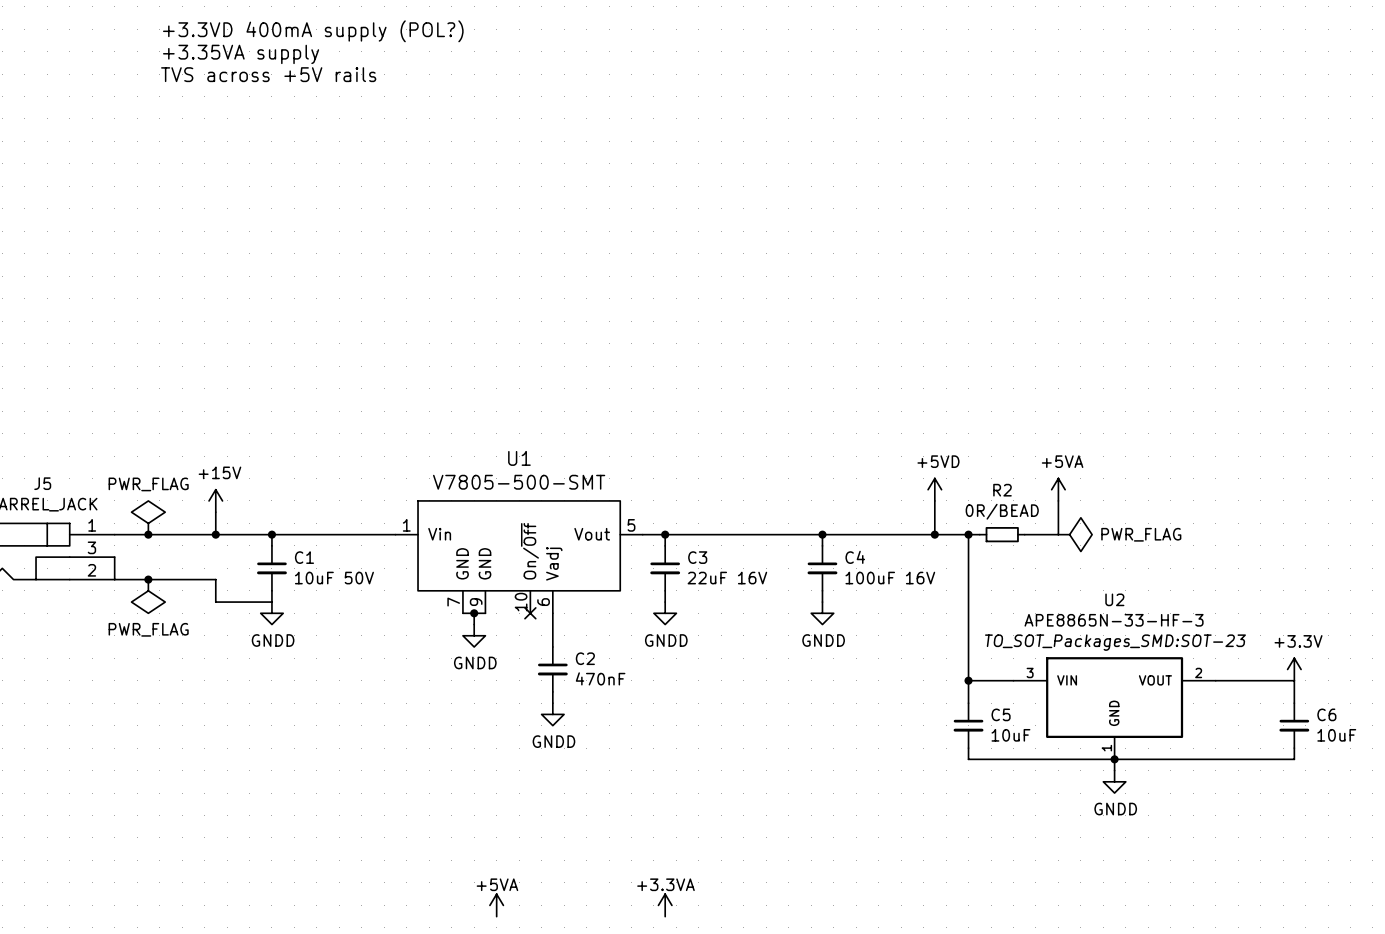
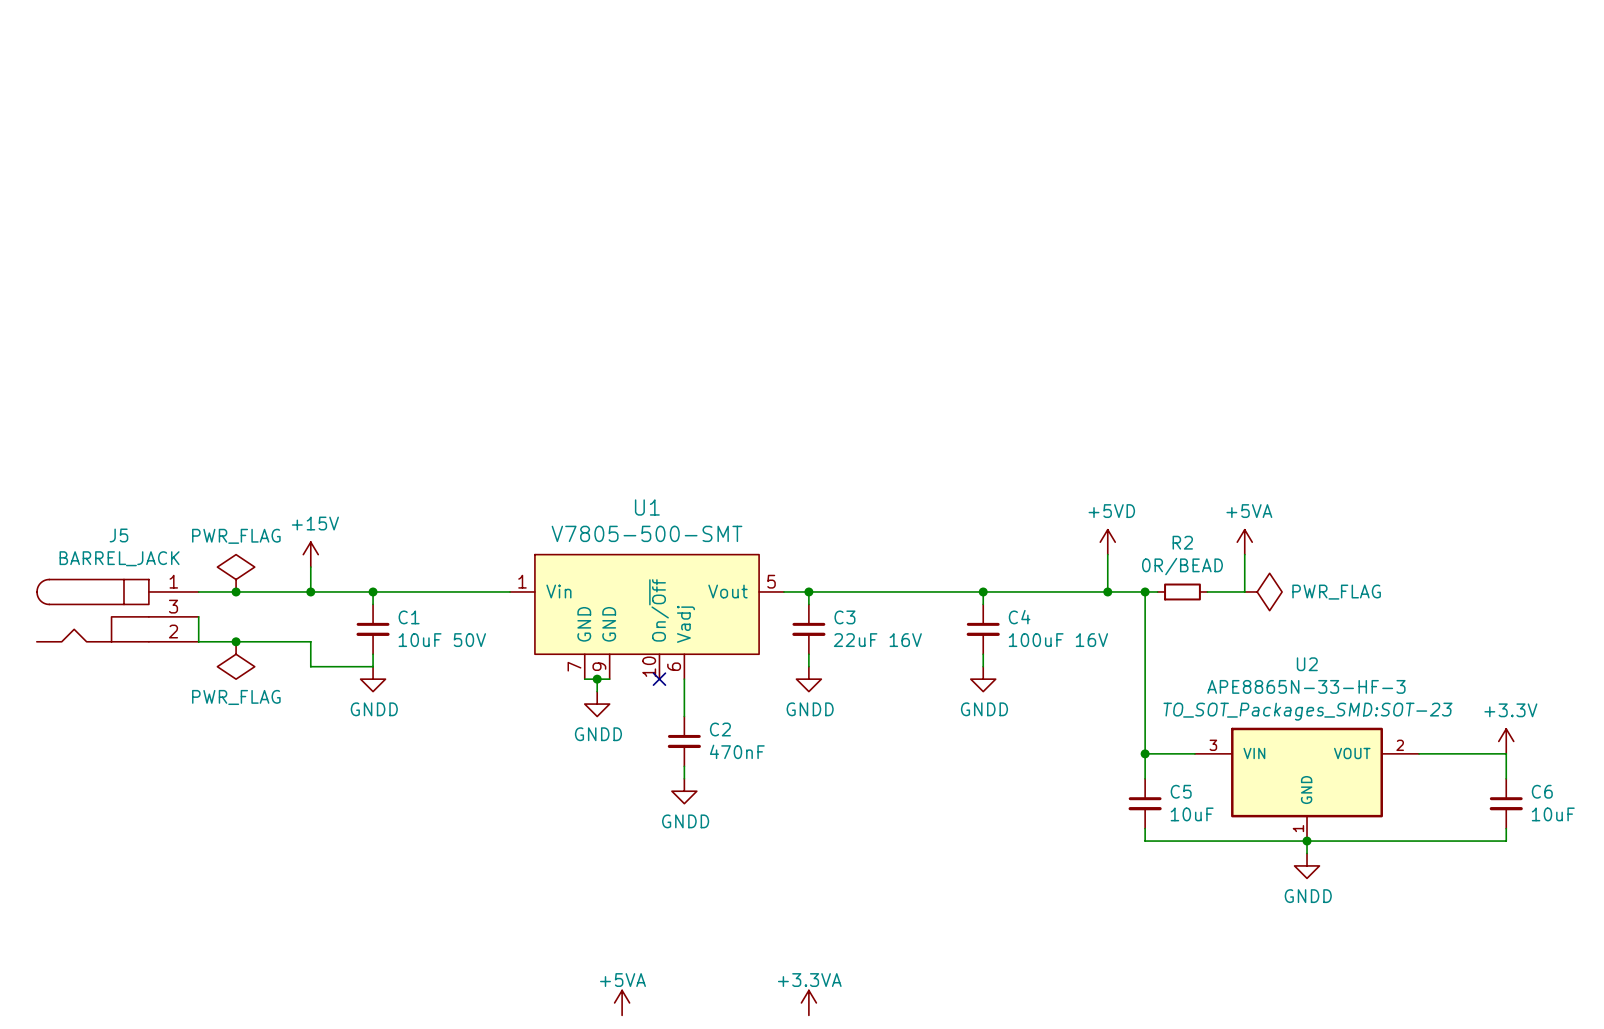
text: +3.3VD 400mA supply (POL?) (313, 31) -> none
text: +3.35VA supply (241, 54) -> none
text: TVS across +5V rails (268, 74) -> none

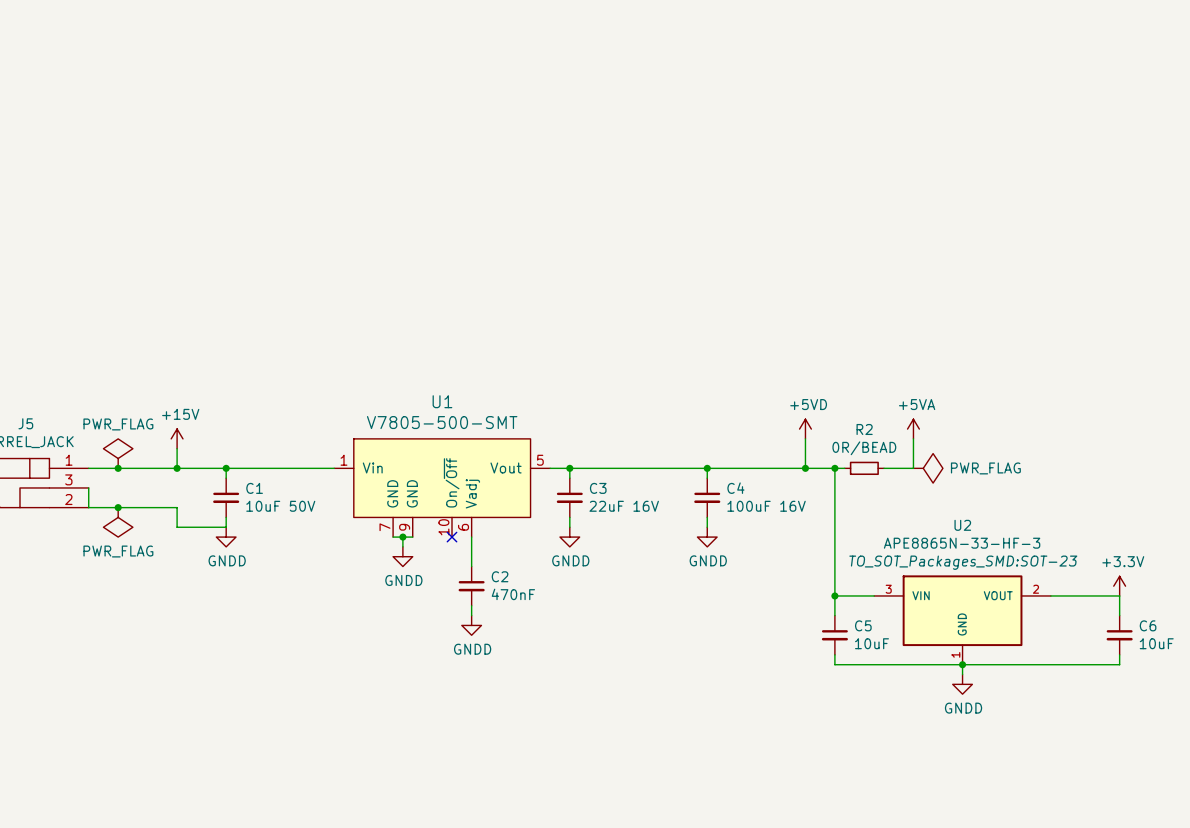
power symbol: +5VA (622, 1002) -> none
power symbol: +3.3VA (808, 1002) -> none

